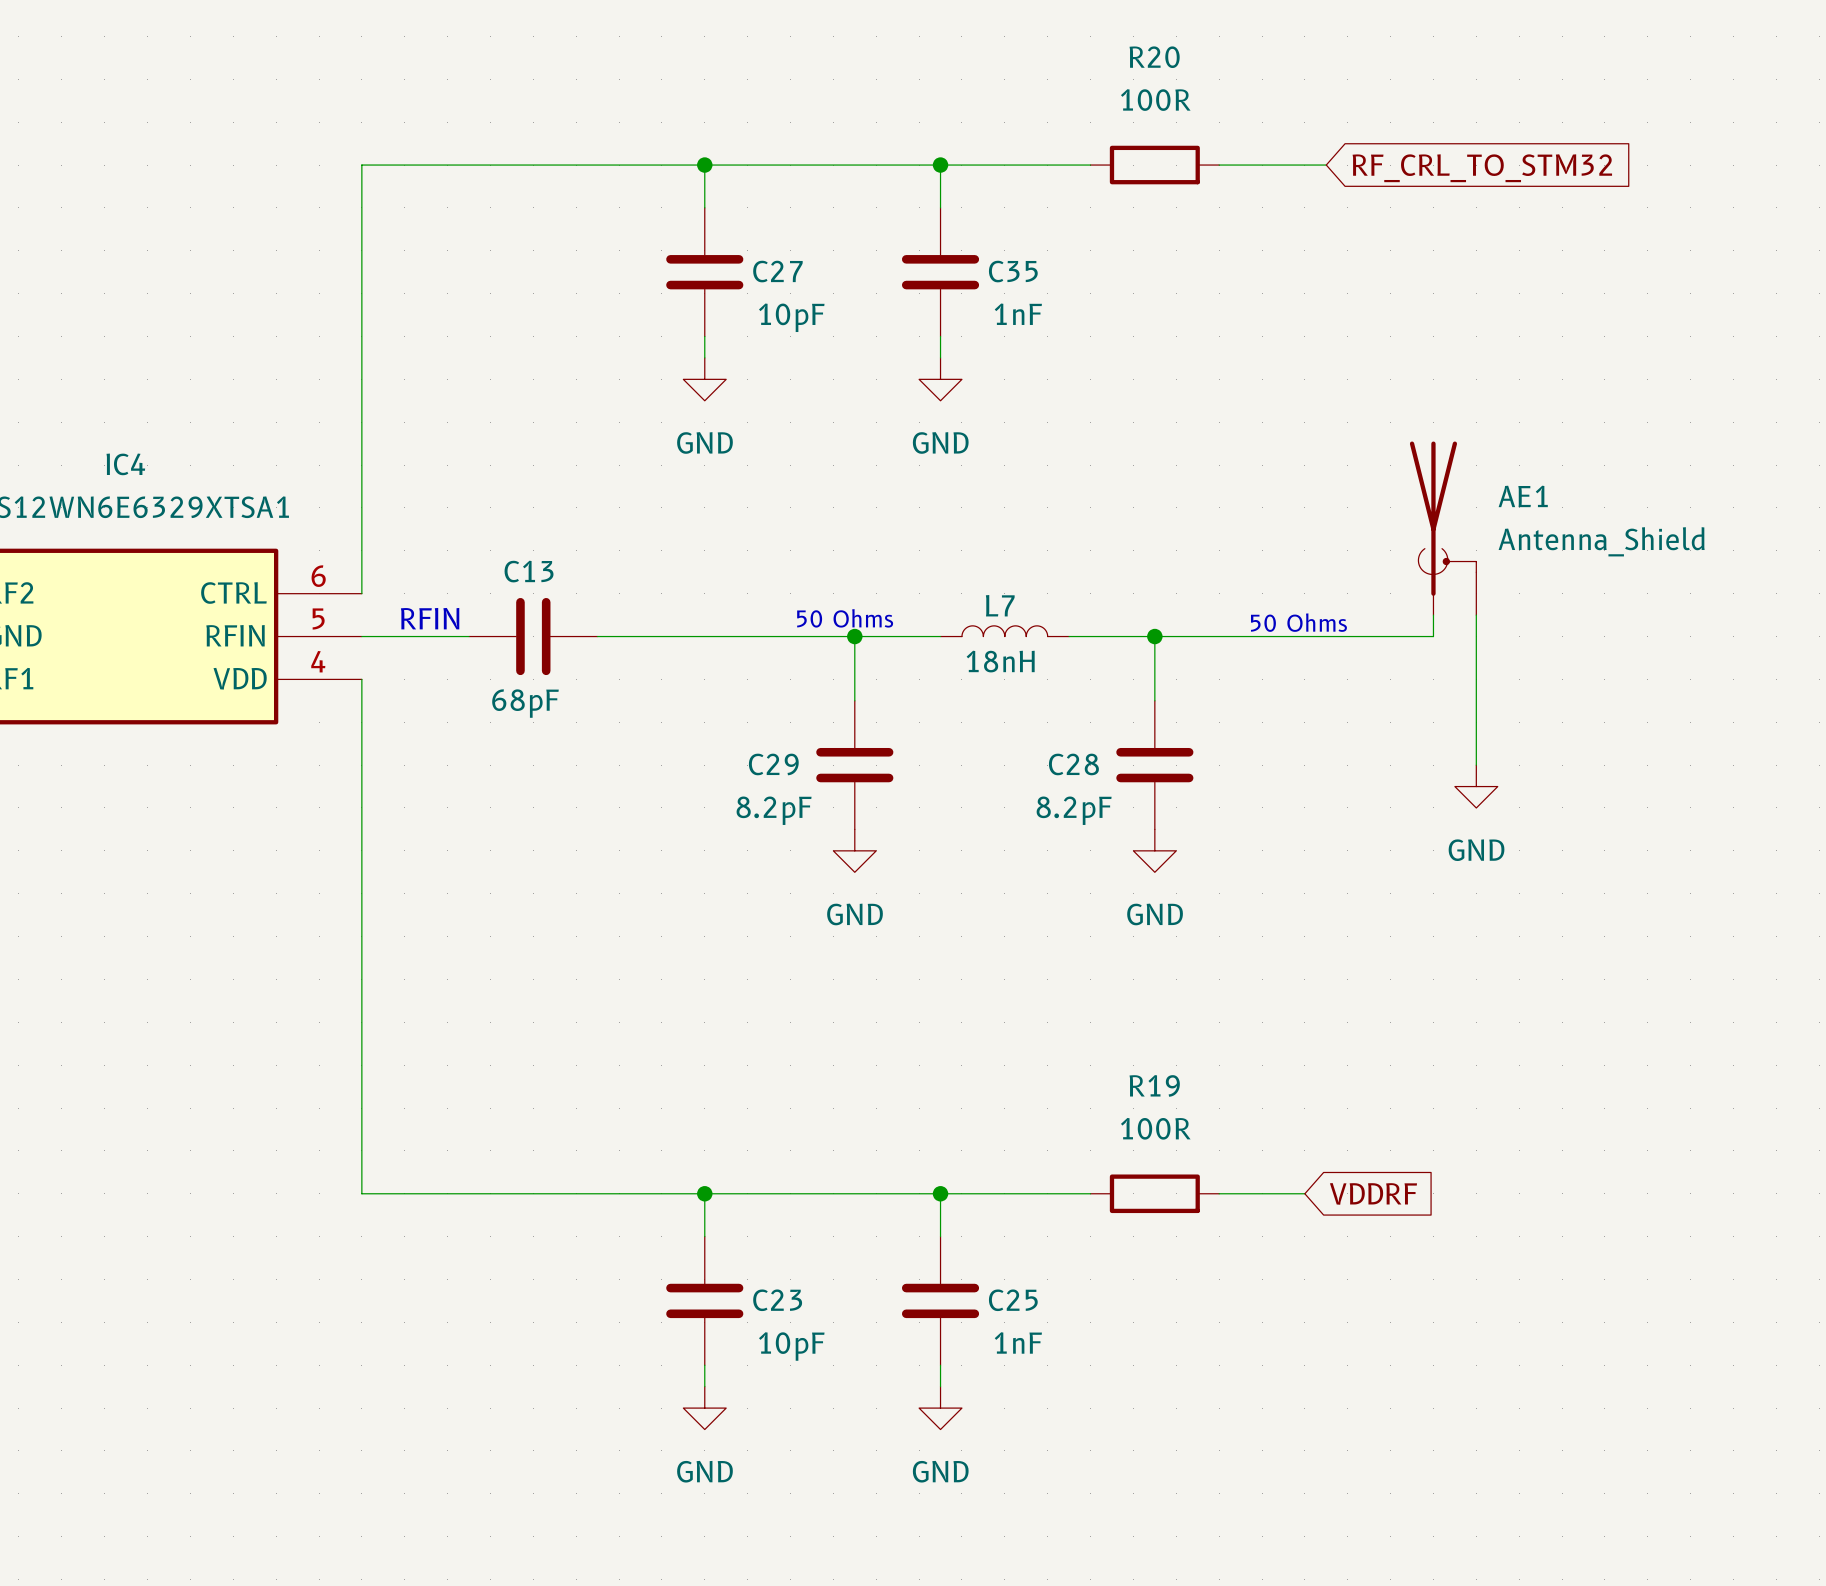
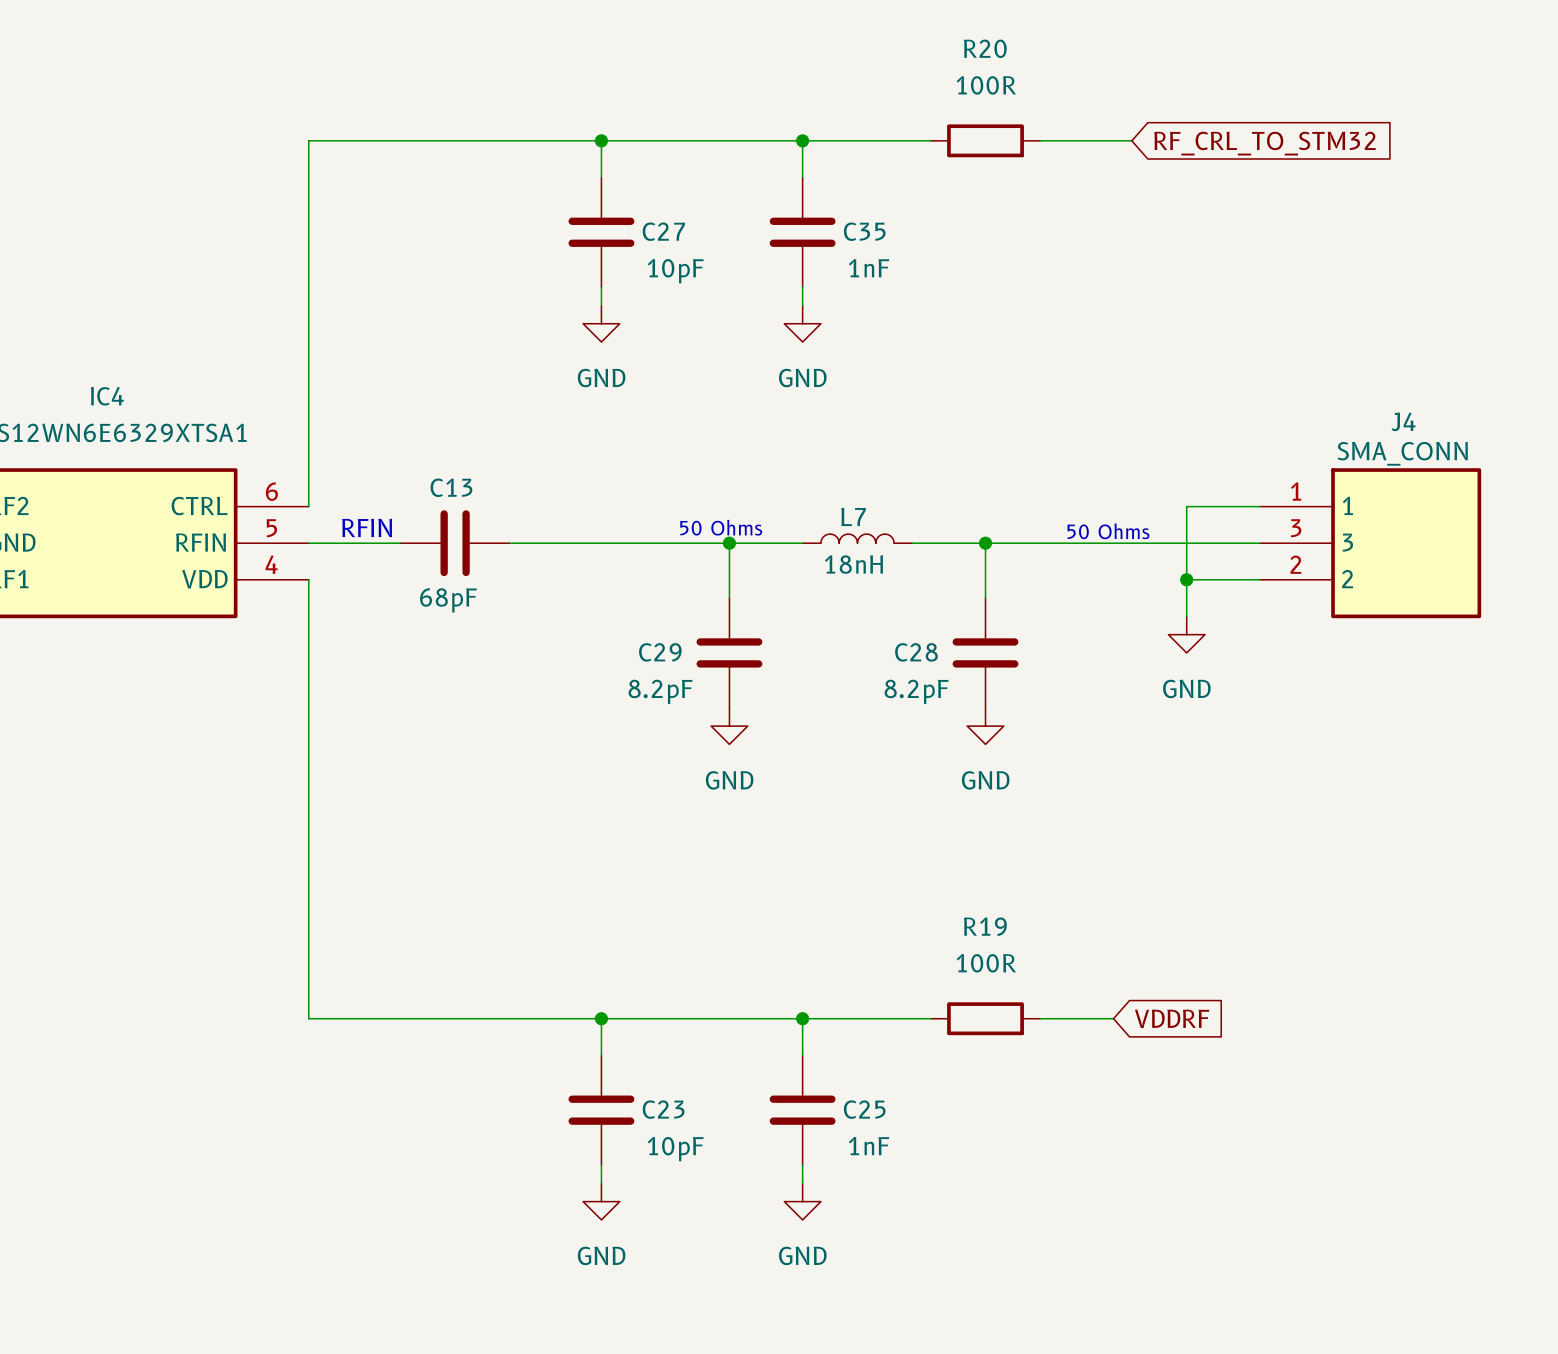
AE1: Antenna_Shield (1443, 528) -> none
wire: none -> (1259, 506) (1186, 506) (1186, 616)
wire: (1433, 615) (1433, 636) -> (1259, 543) (1223, 543)
wire: (1476, 615) (1476, 765) -> none
J4: none -> SMA_CONN (1370, 543)
wire: none -> (1186, 579) (1259, 579)
junction: none -> (1186, 579)
power symbol position: GND (1476, 786) -> GND (1186, 634)

